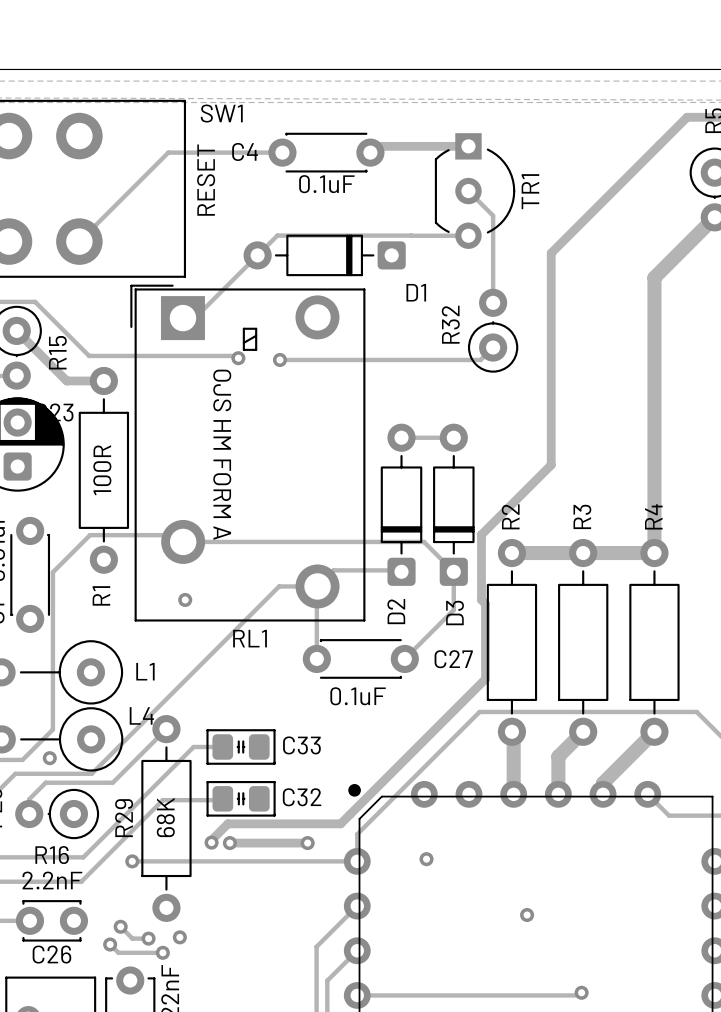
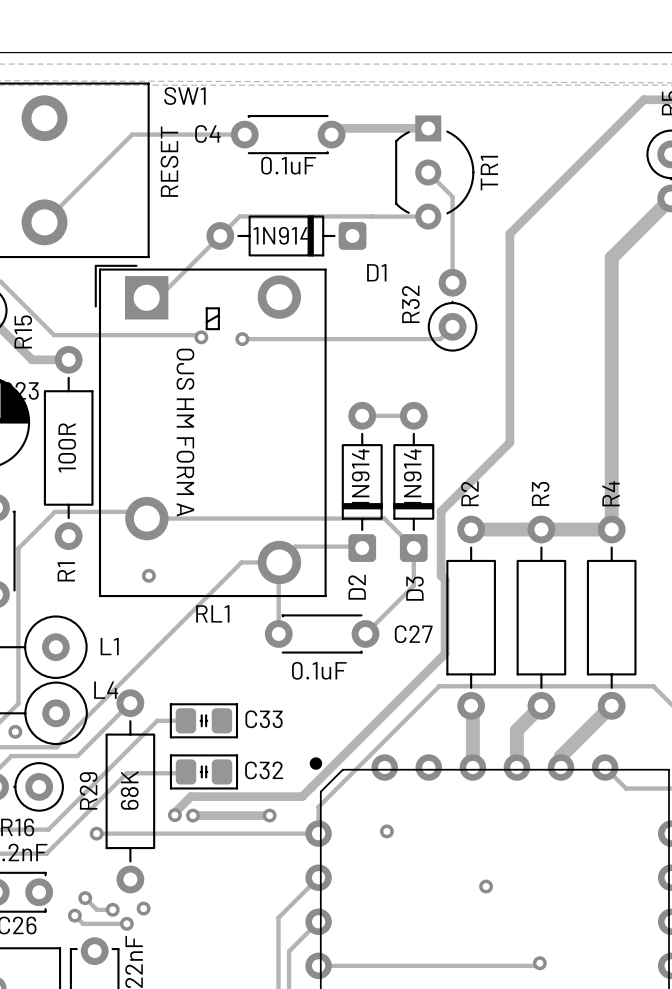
D1 value: none -> 1N914 (282, 235)
D2 value: none -> 1N914 (360, 477)
D3 value: none -> 1N914 (412, 477)

